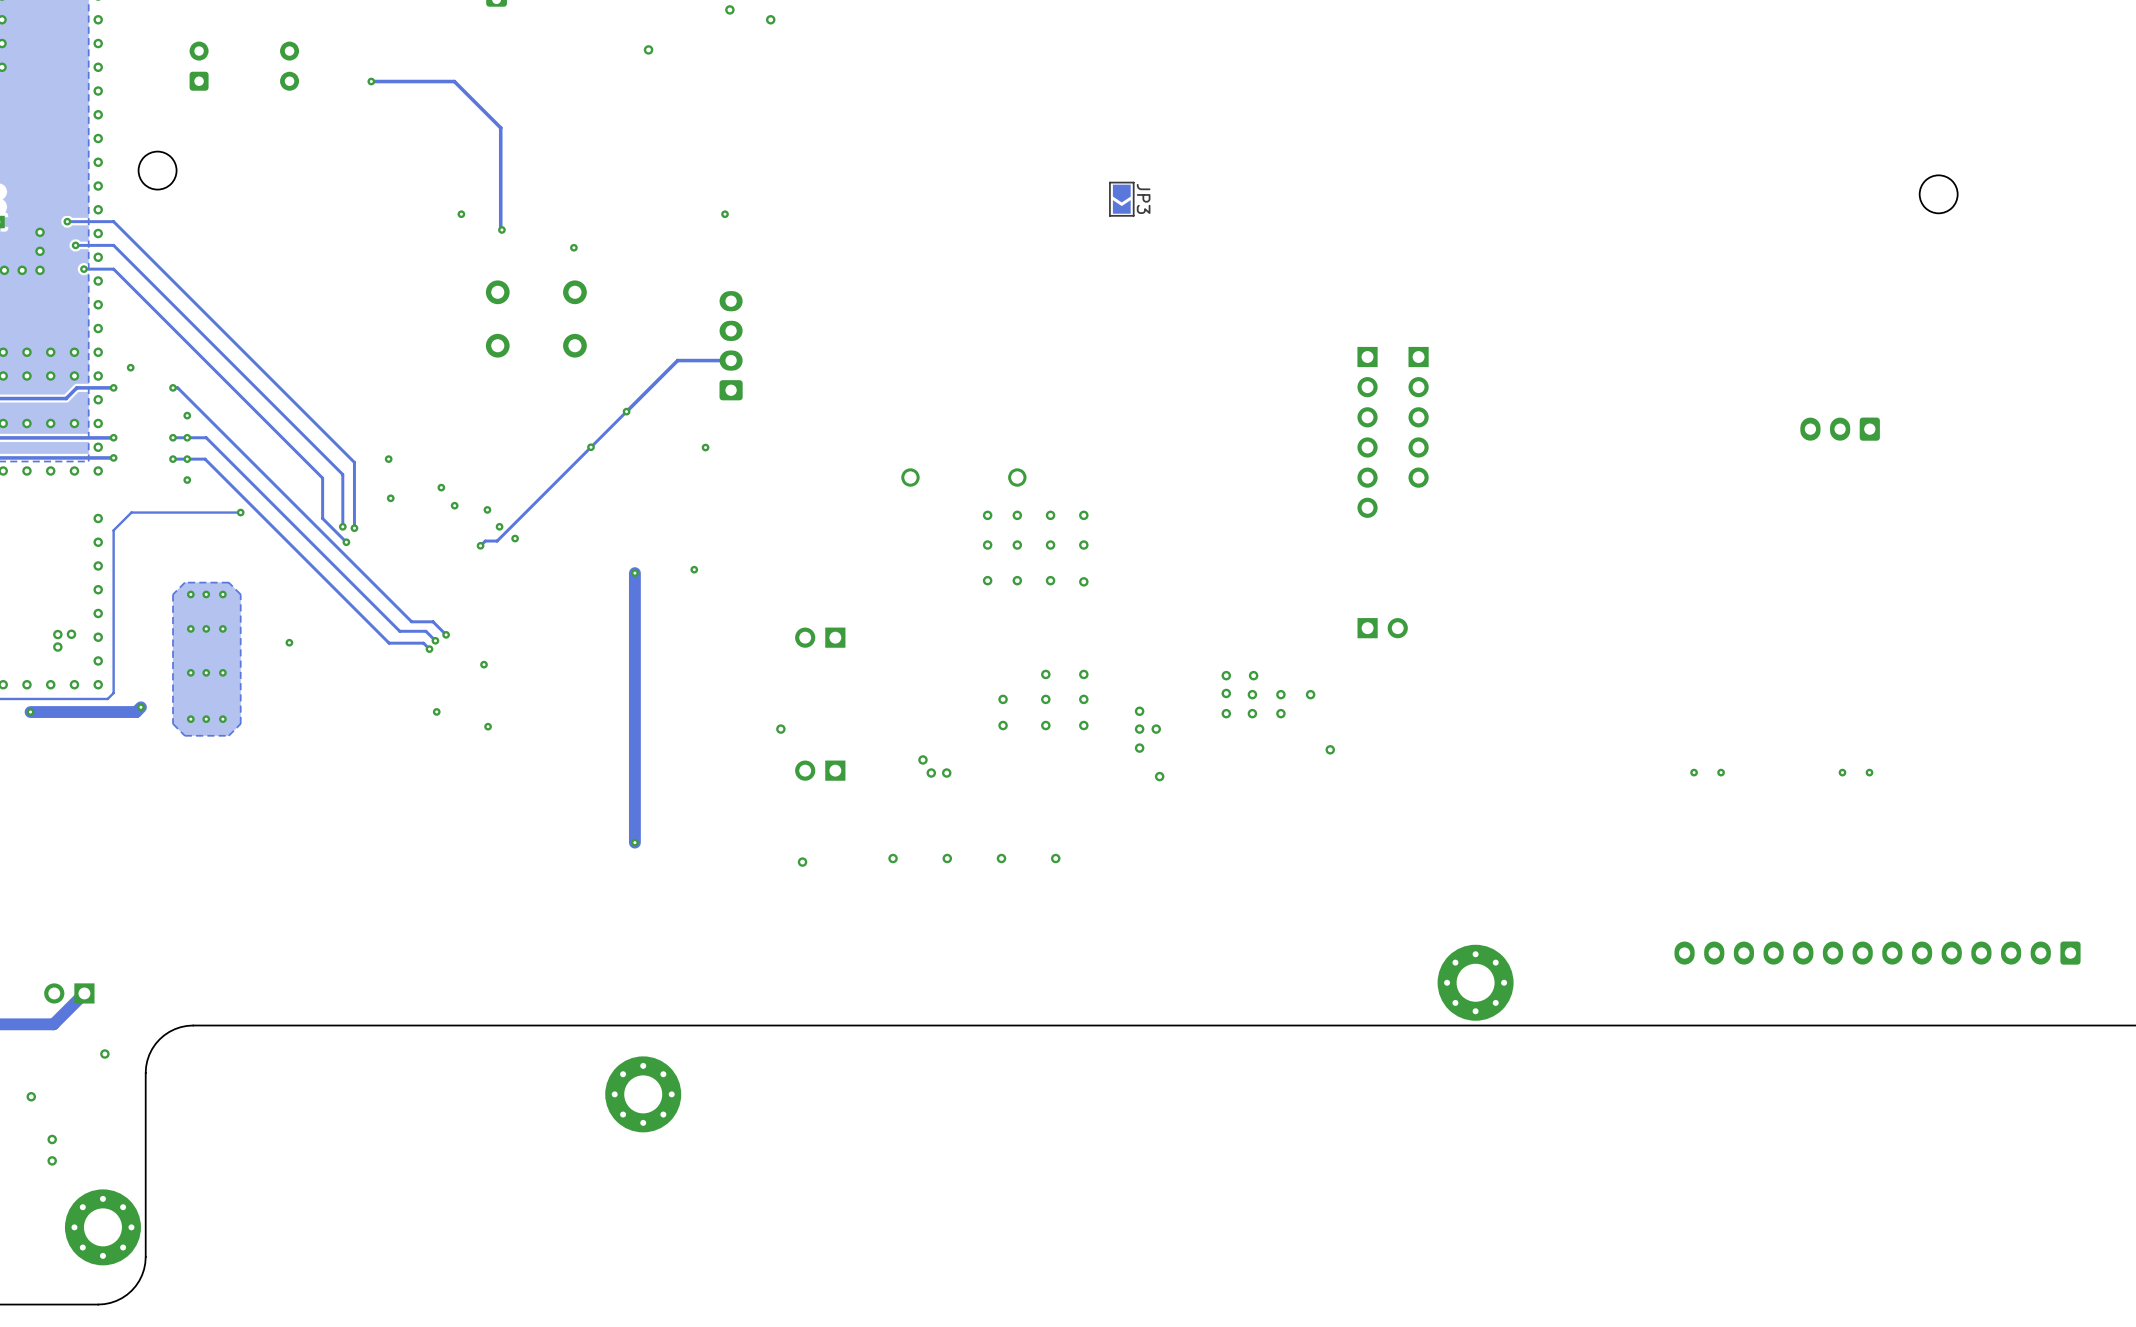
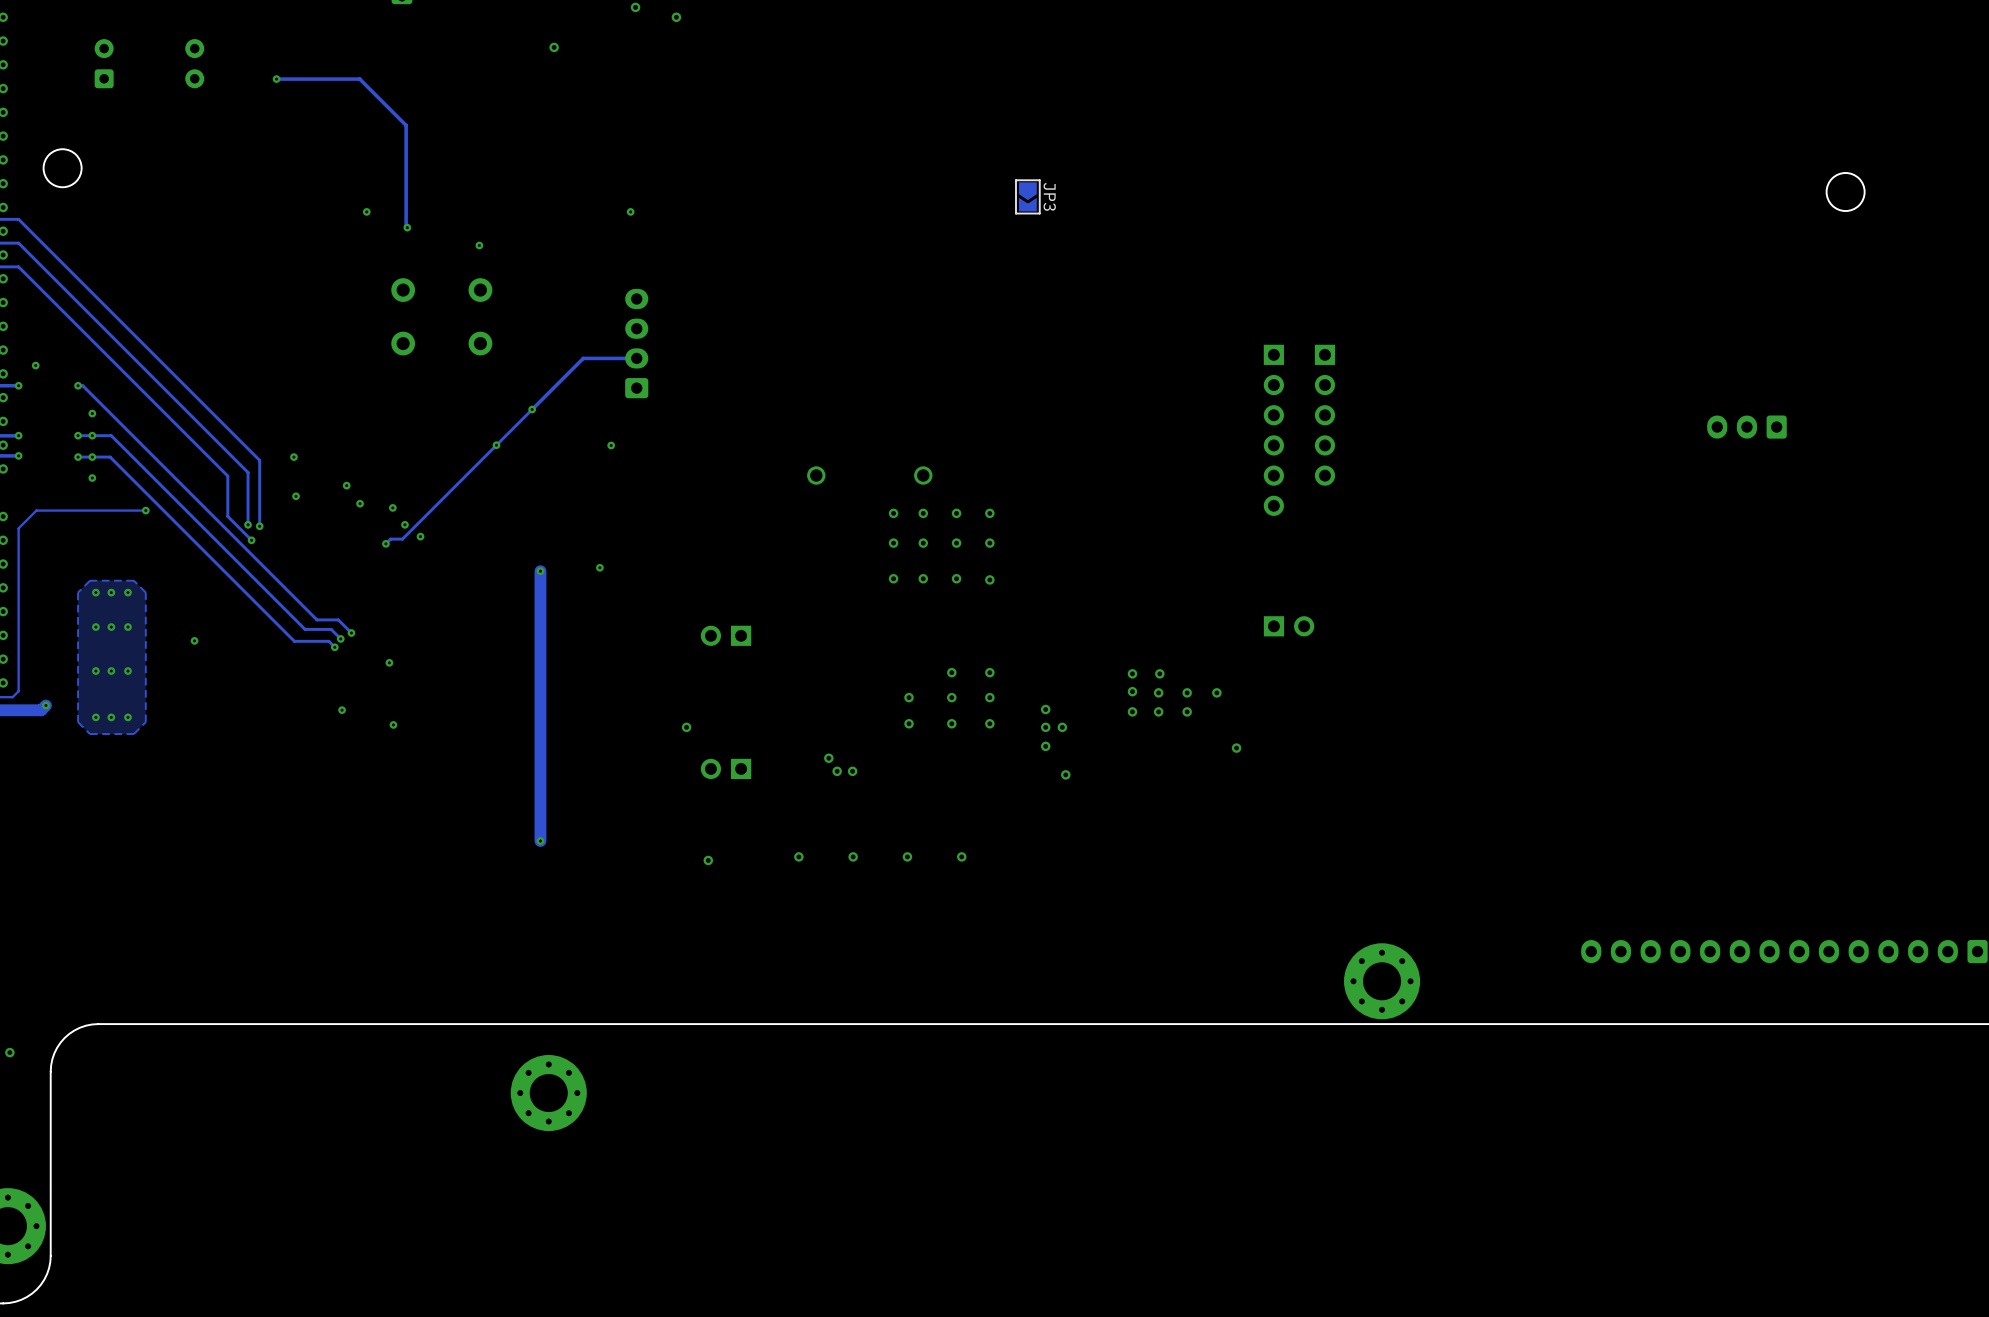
via: (1694, 772) -> none
via: (1721, 772) -> none
via: (1842, 772) -> none
via: (1869, 772) -> none

